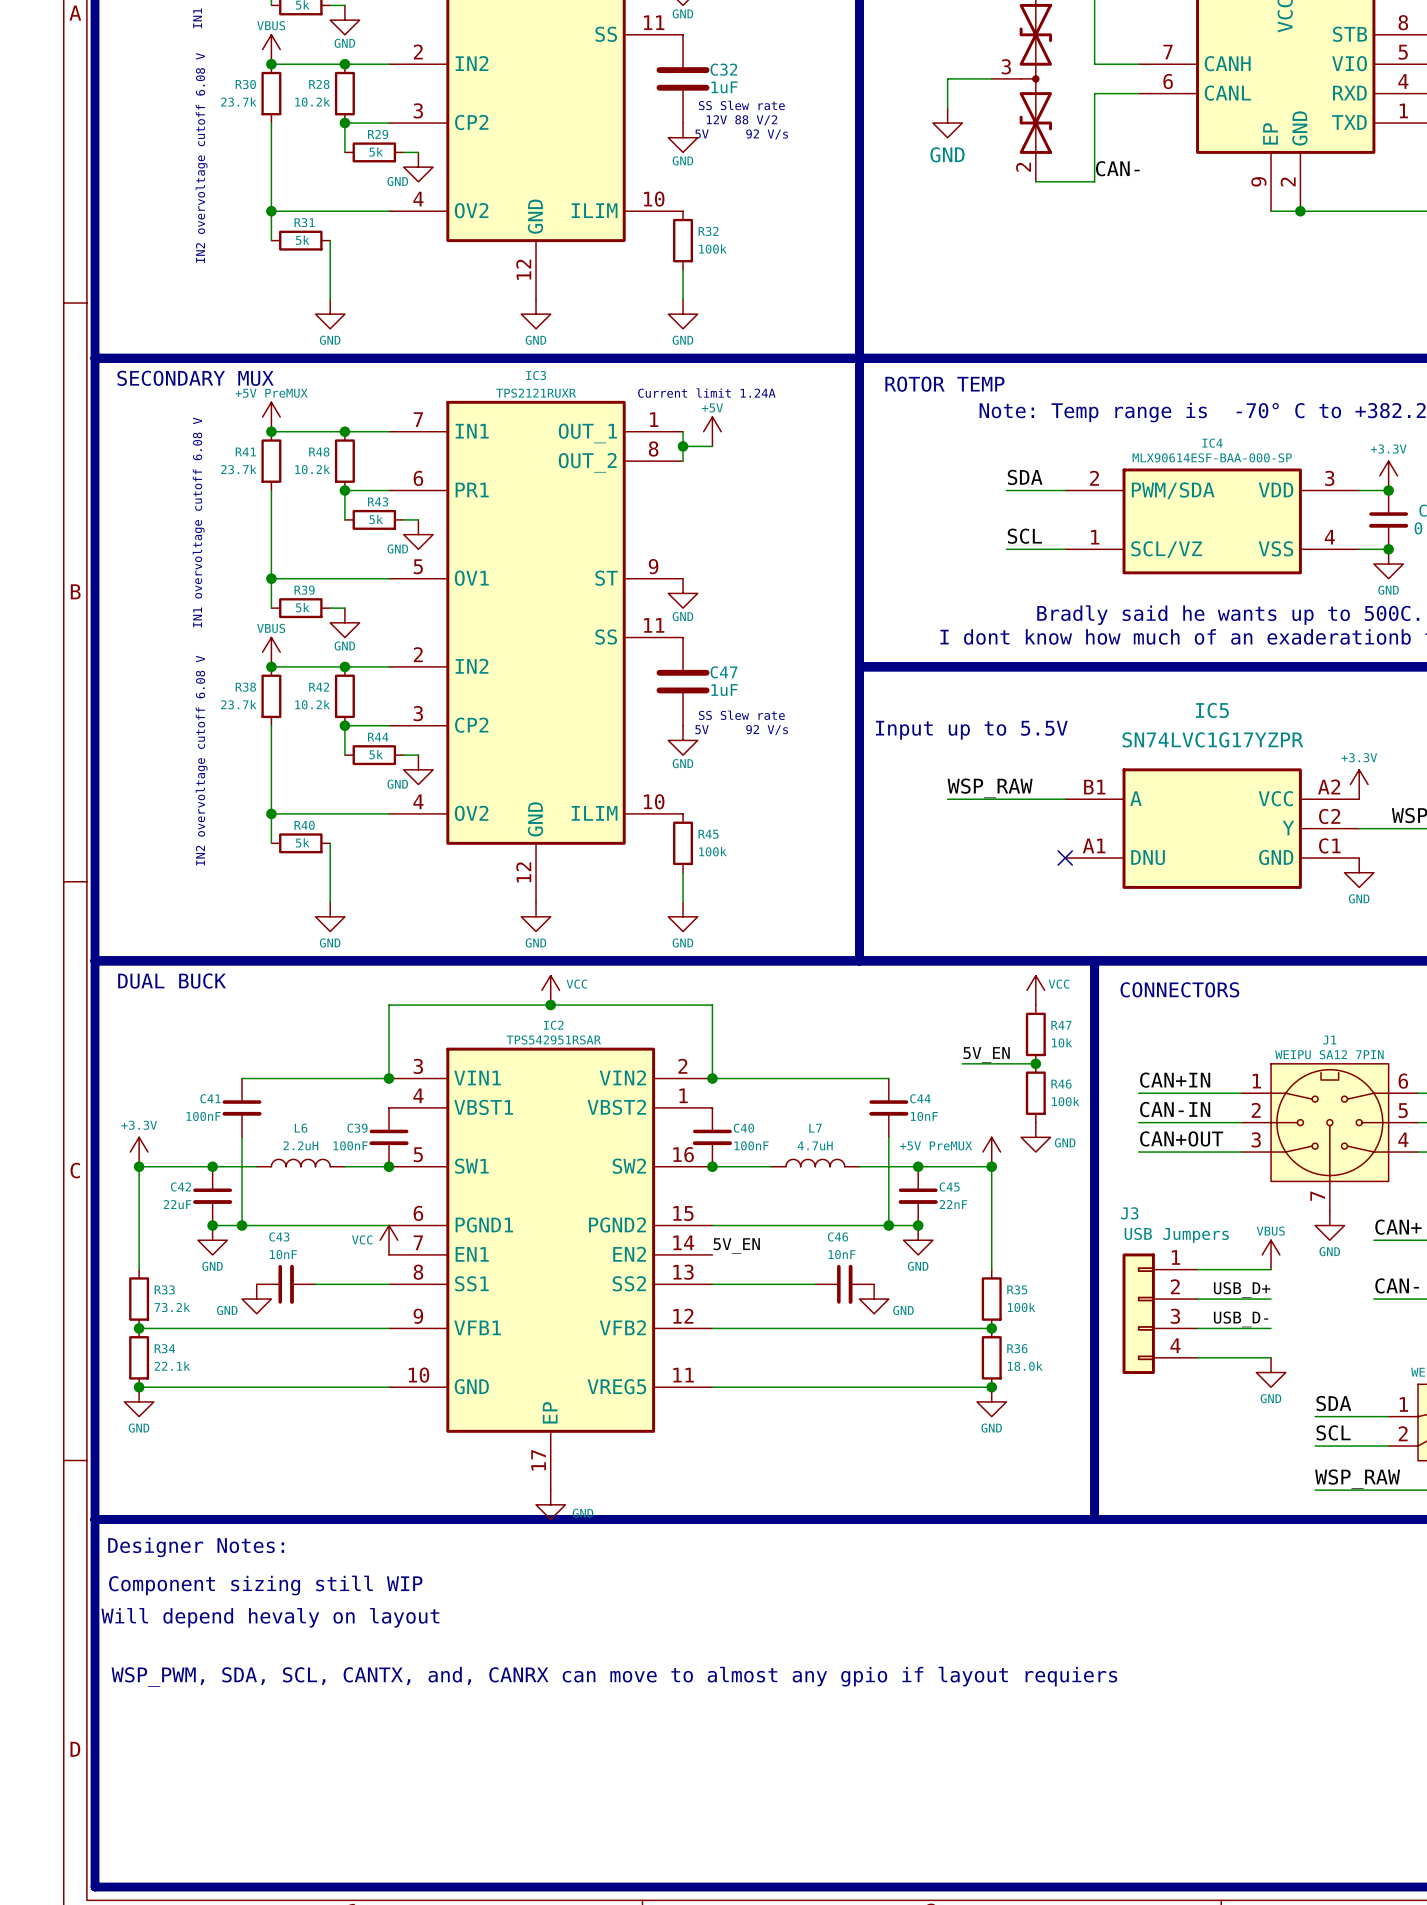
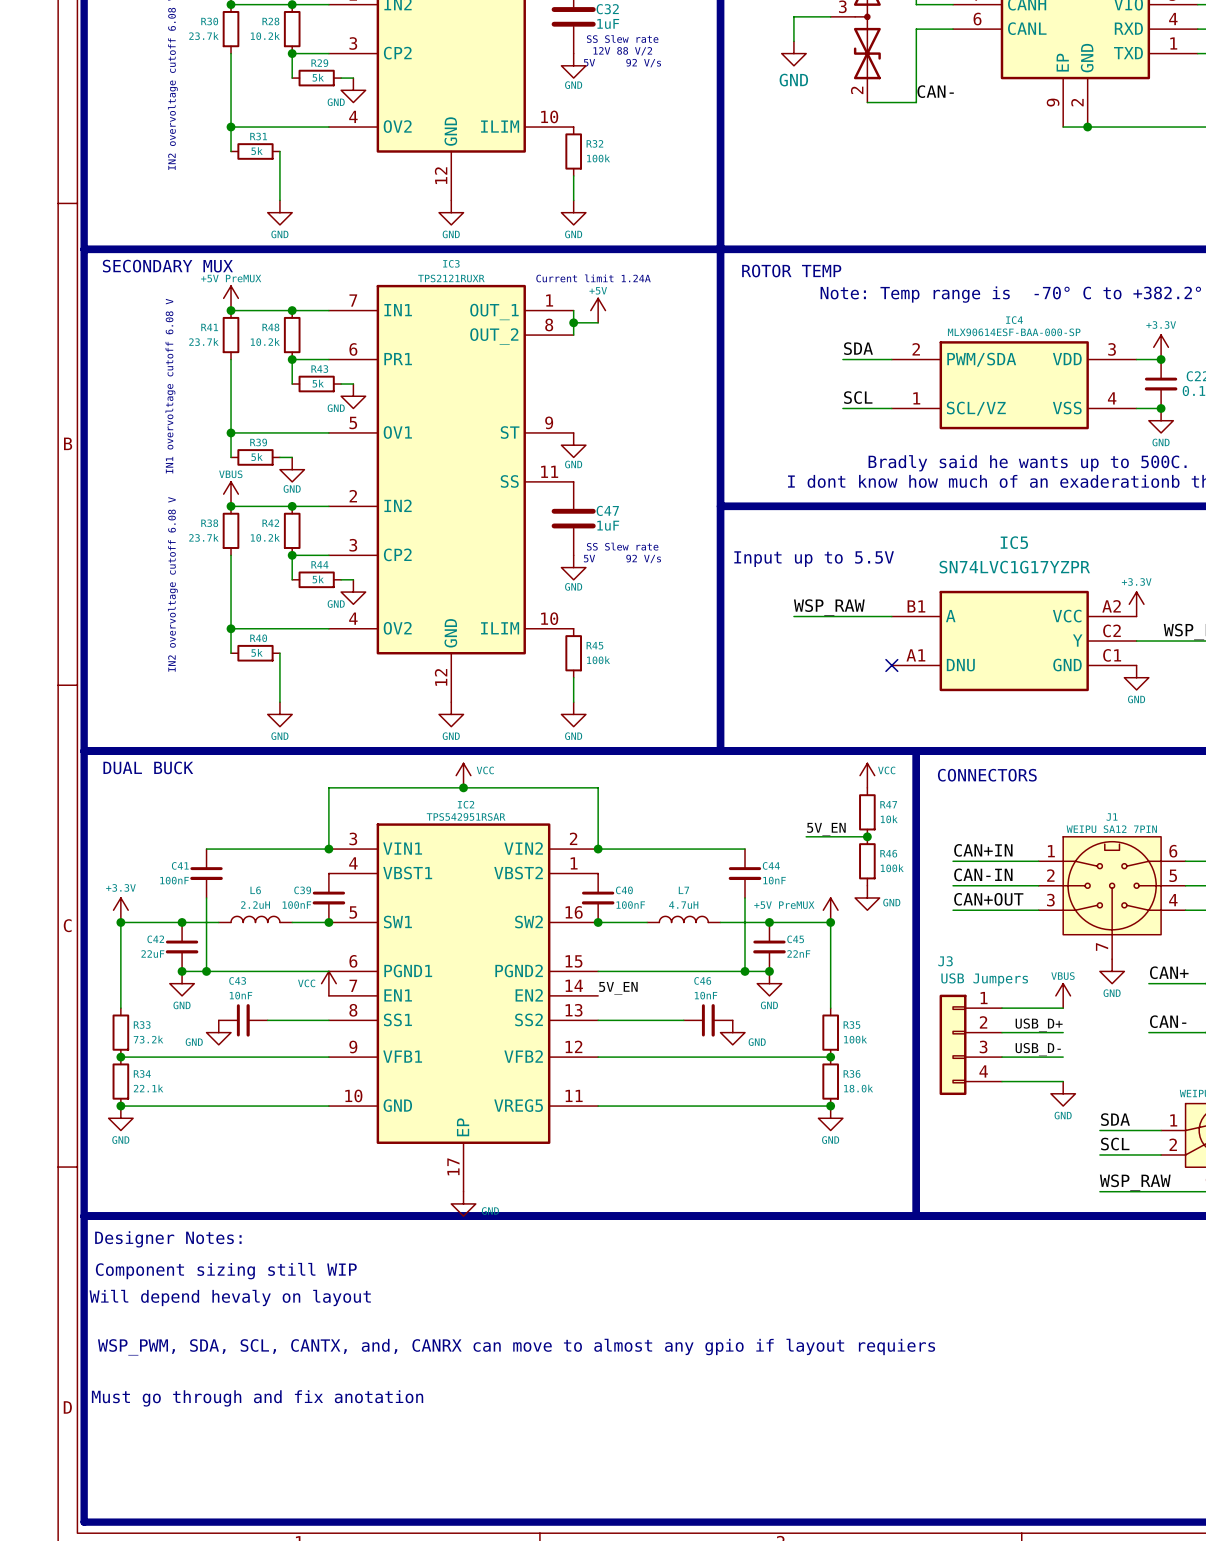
text: none -> Must go through and fix anotation (257, 1398)

